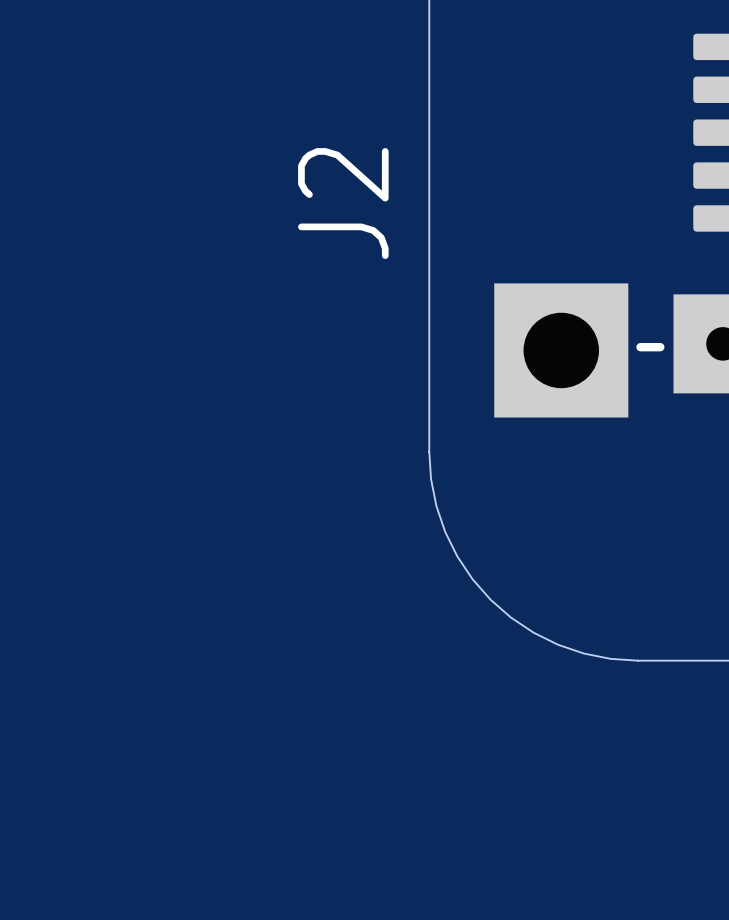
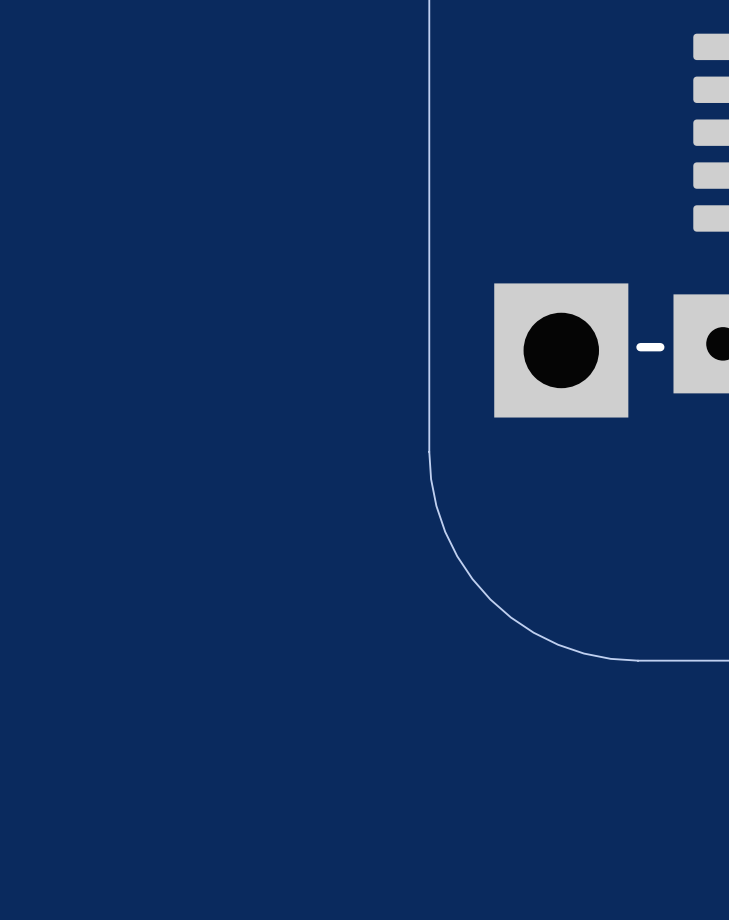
J2 name: J2 (343, 203) -> none

